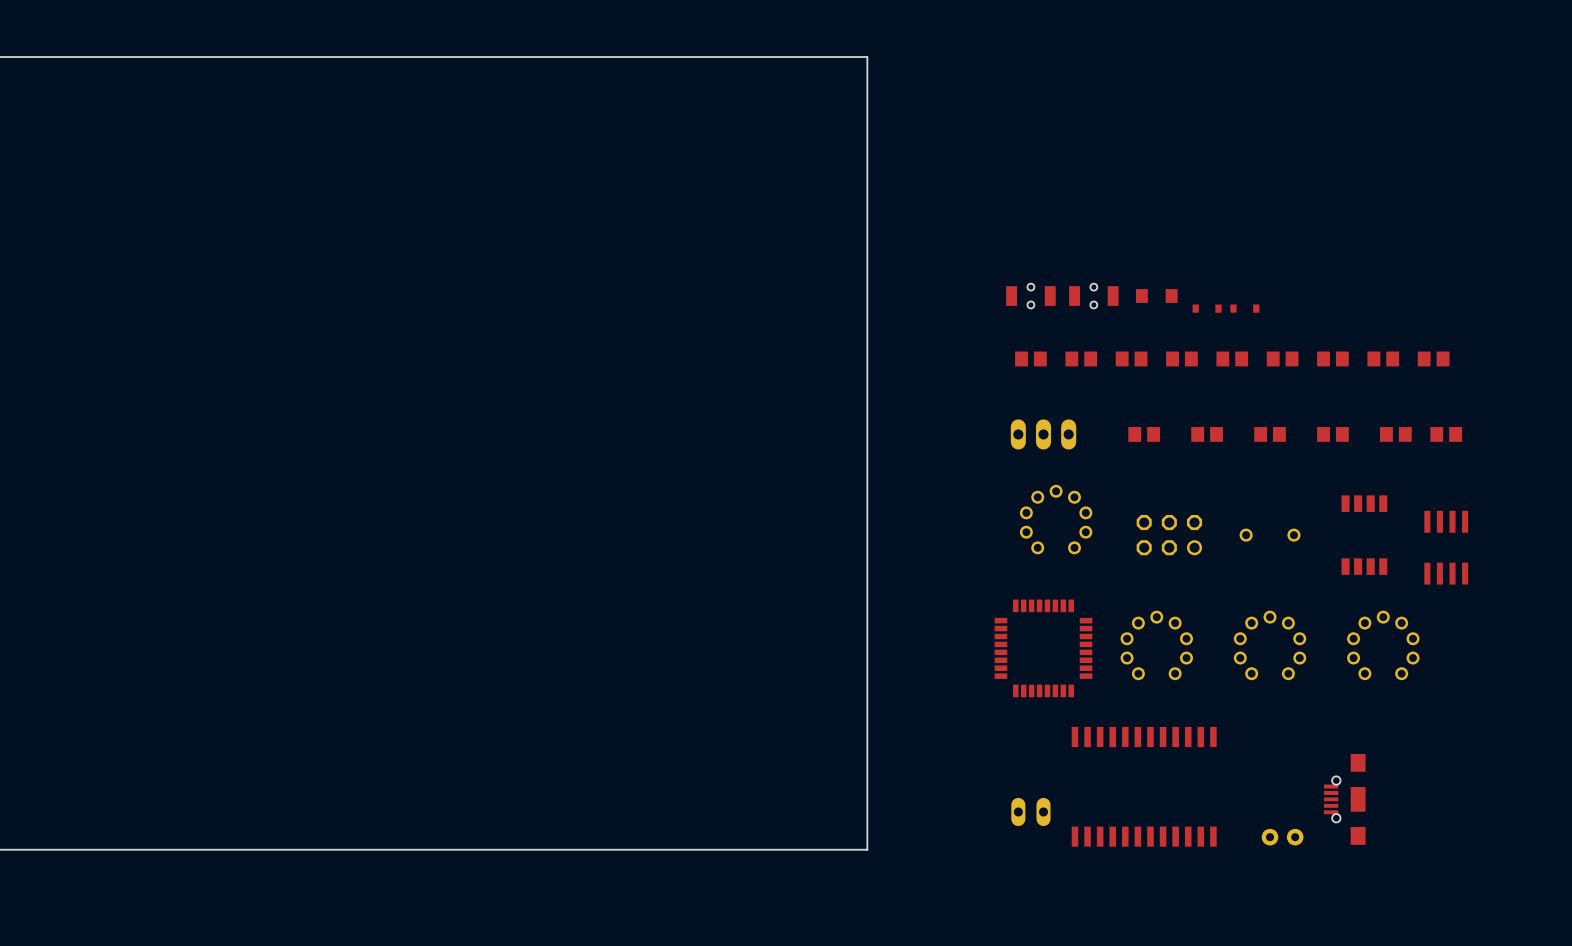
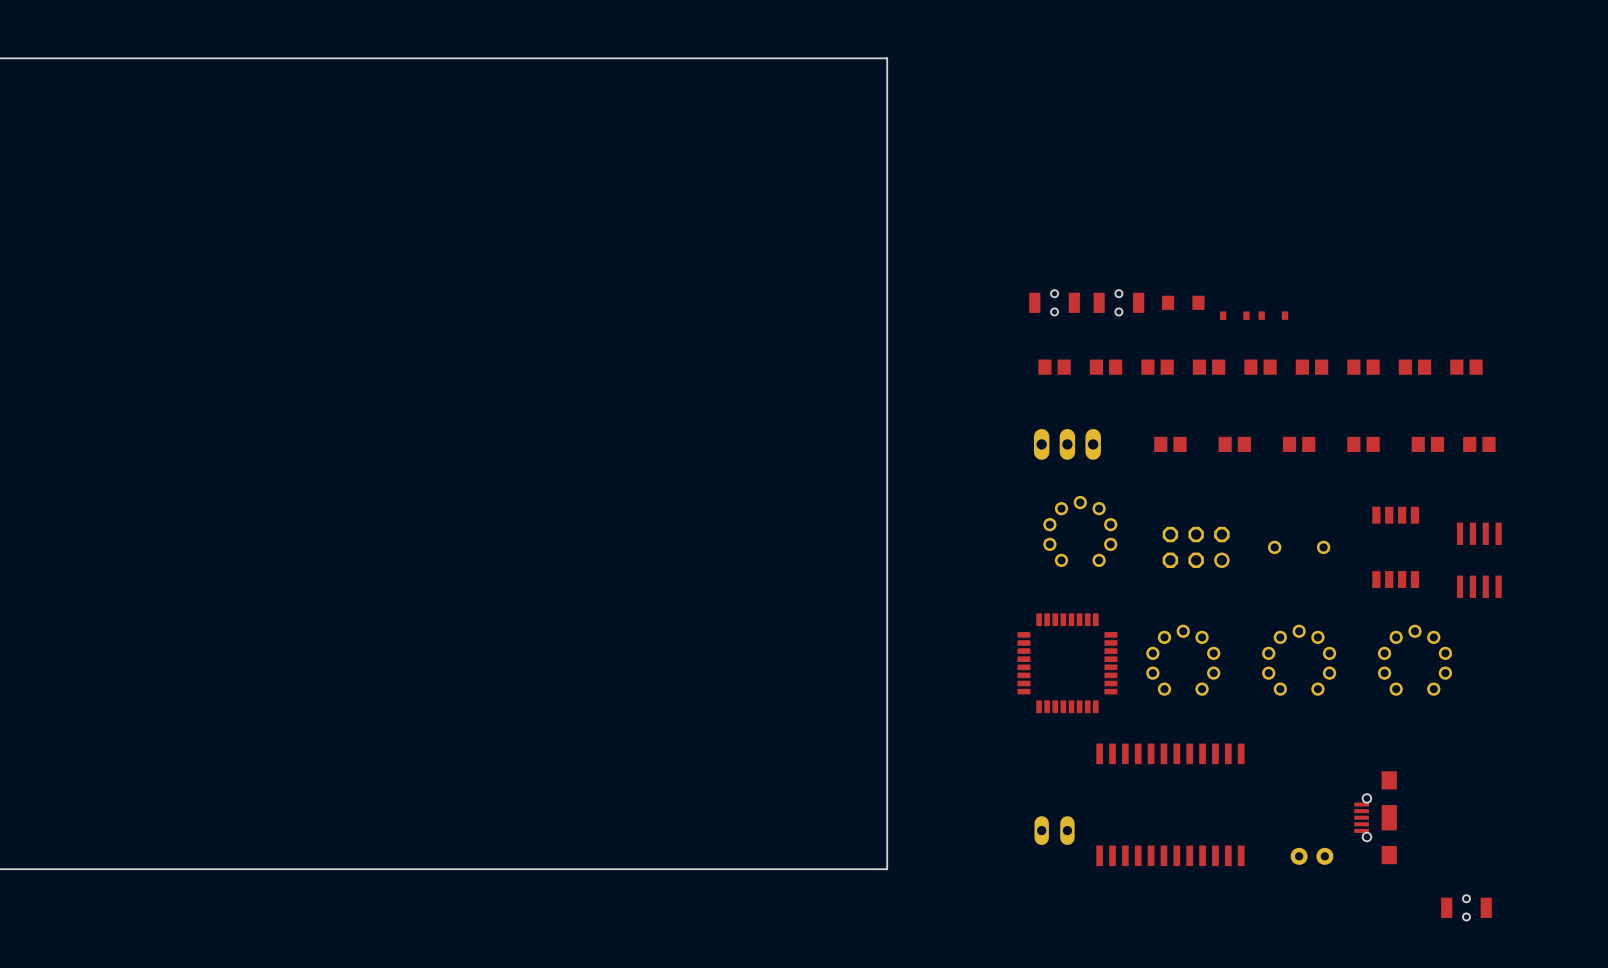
part: none -> (1466, 907)

